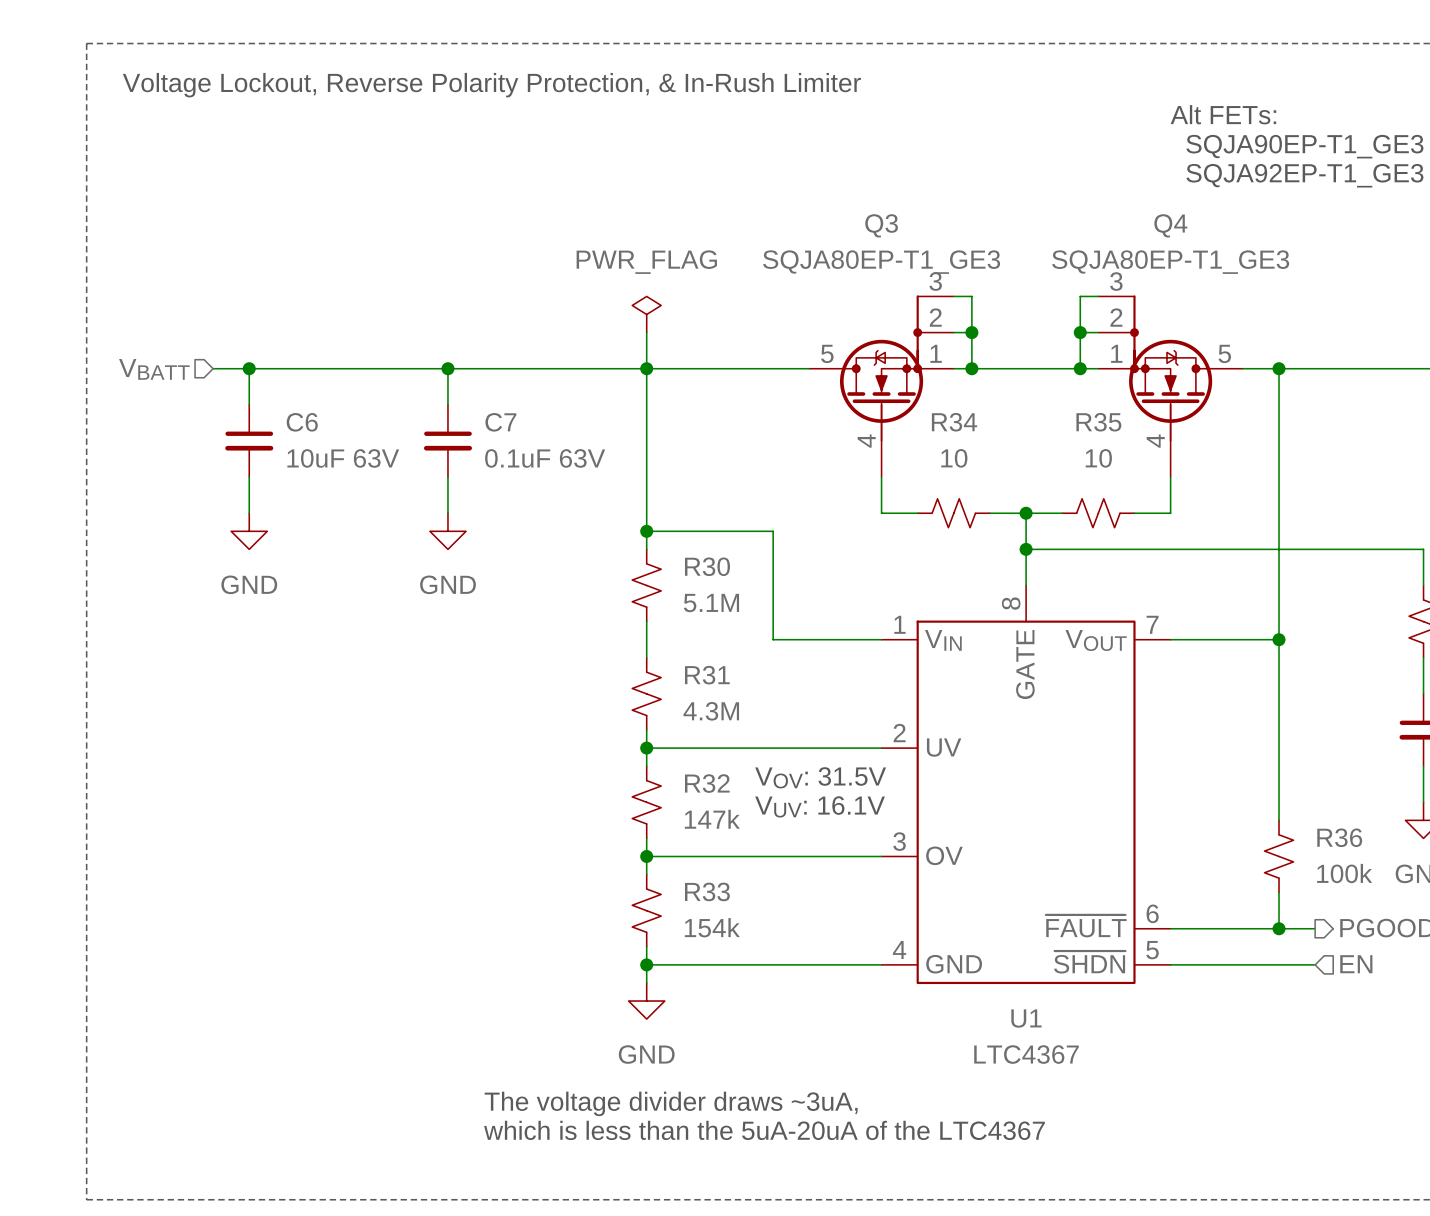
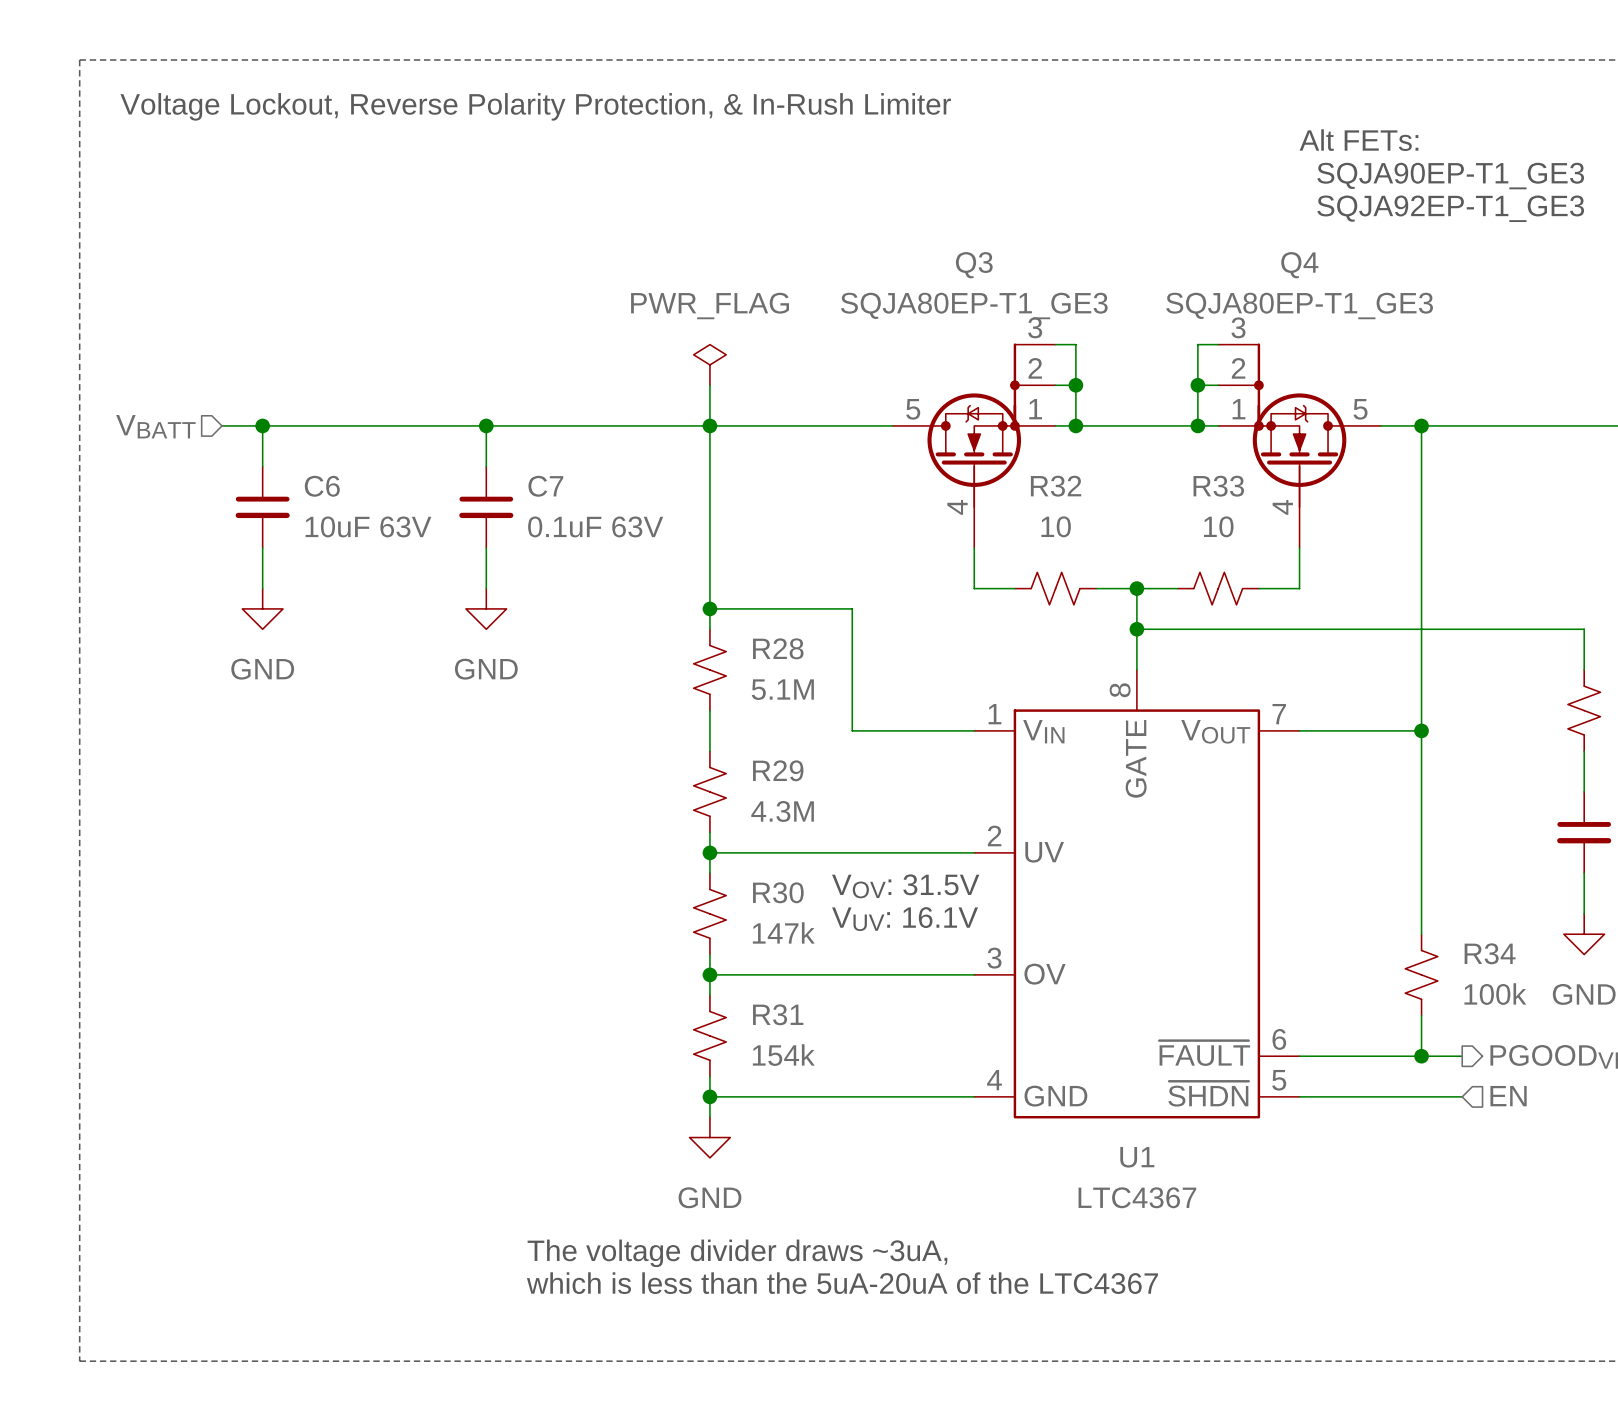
R34 name: R34 (954, 422) -> R32 (1056, 486)
R35 name: R35 (1098, 422) -> R33 (1218, 486)
R30 name: R30 (707, 566) -> R28 (778, 648)
R31 name: R31 (707, 675) -> R29 (778, 770)
R32 name: R32 (707, 783) -> R30 (778, 892)
R36 name: R36 (1339, 837) -> R34 (1490, 953)
R33 name: R33 (707, 891) -> R31 (778, 1014)

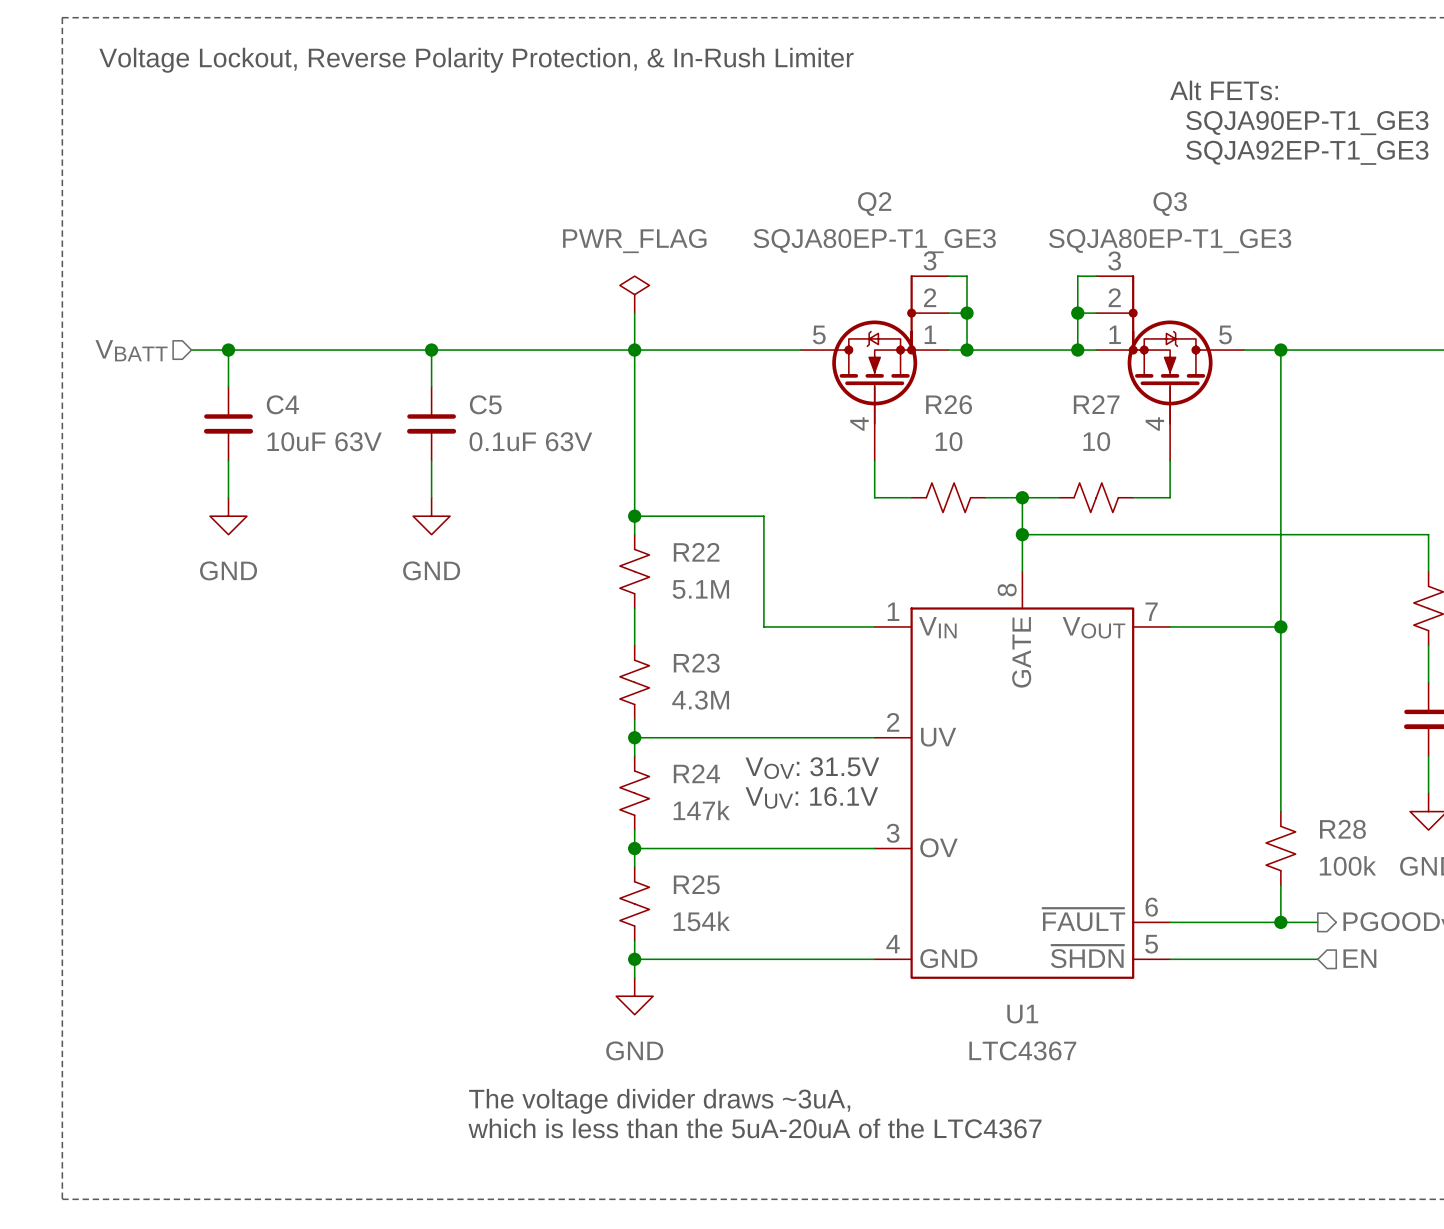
Q3 name: Q3 (974, 265) -> Q2 (874, 204)
Q4 name: Q4 (1299, 265) -> Q3 (1170, 204)
C6 name: C6 (322, 486) -> C4 (282, 404)
C7 name: C7 (545, 486) -> C5 (485, 404)
R32 name: R32 (1056, 486) -> R26 (949, 404)
R33 name: R33 (1218, 486) -> R27 (1096, 404)
R28 name: R28 (778, 648) -> R22 (696, 552)
R29 name: R29 (778, 770) -> R23 (696, 663)
R30 name: R30 (778, 892) -> R24 (696, 773)
R34 name: R34 (1490, 953) -> R28 (1342, 829)
R31 name: R31 (778, 1014) -> R25 (696, 884)

